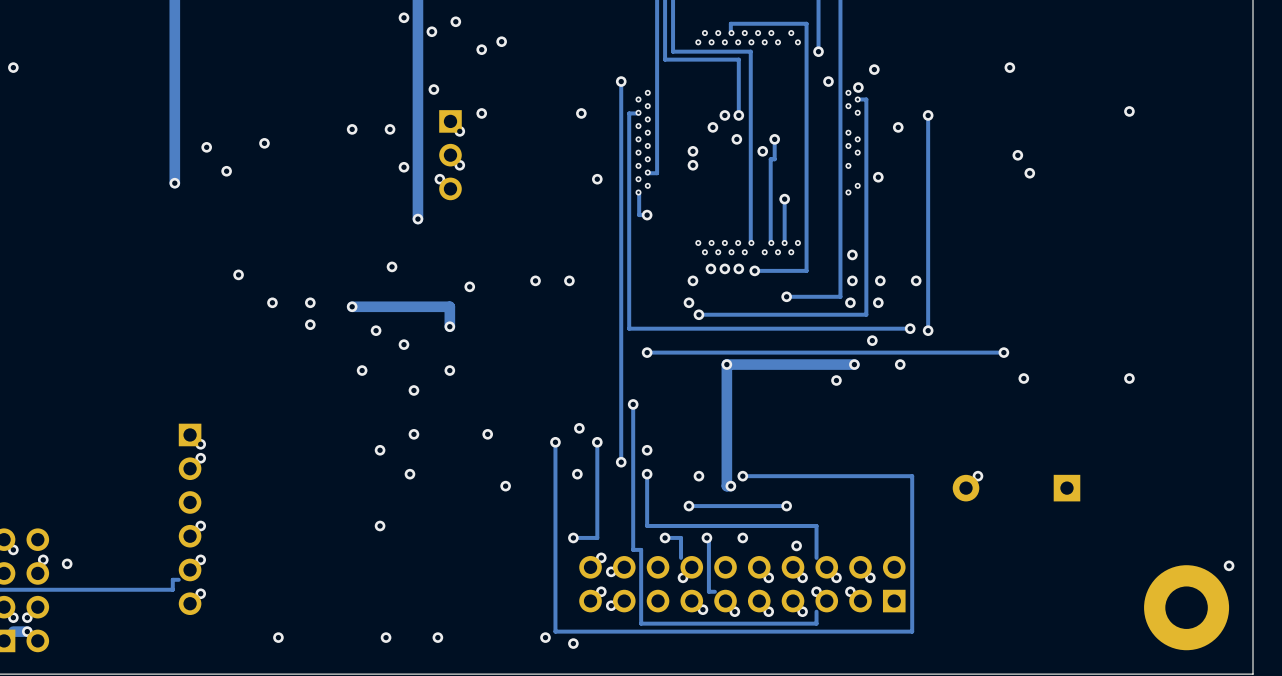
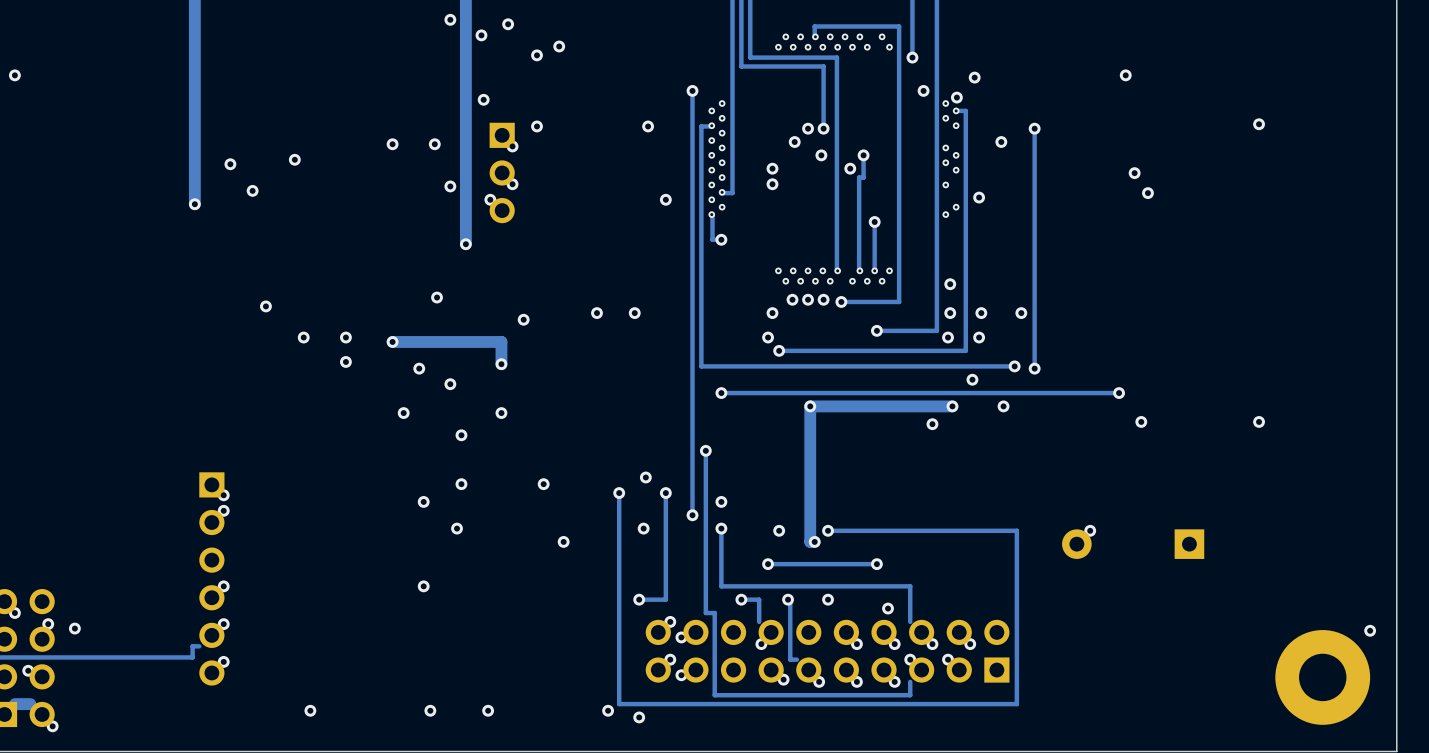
via: none -> (28, 670)
via: (13, 617) -> none
via: (27, 617) -> none
via: (27, 631) -> none
via: none -> (52, 726)

